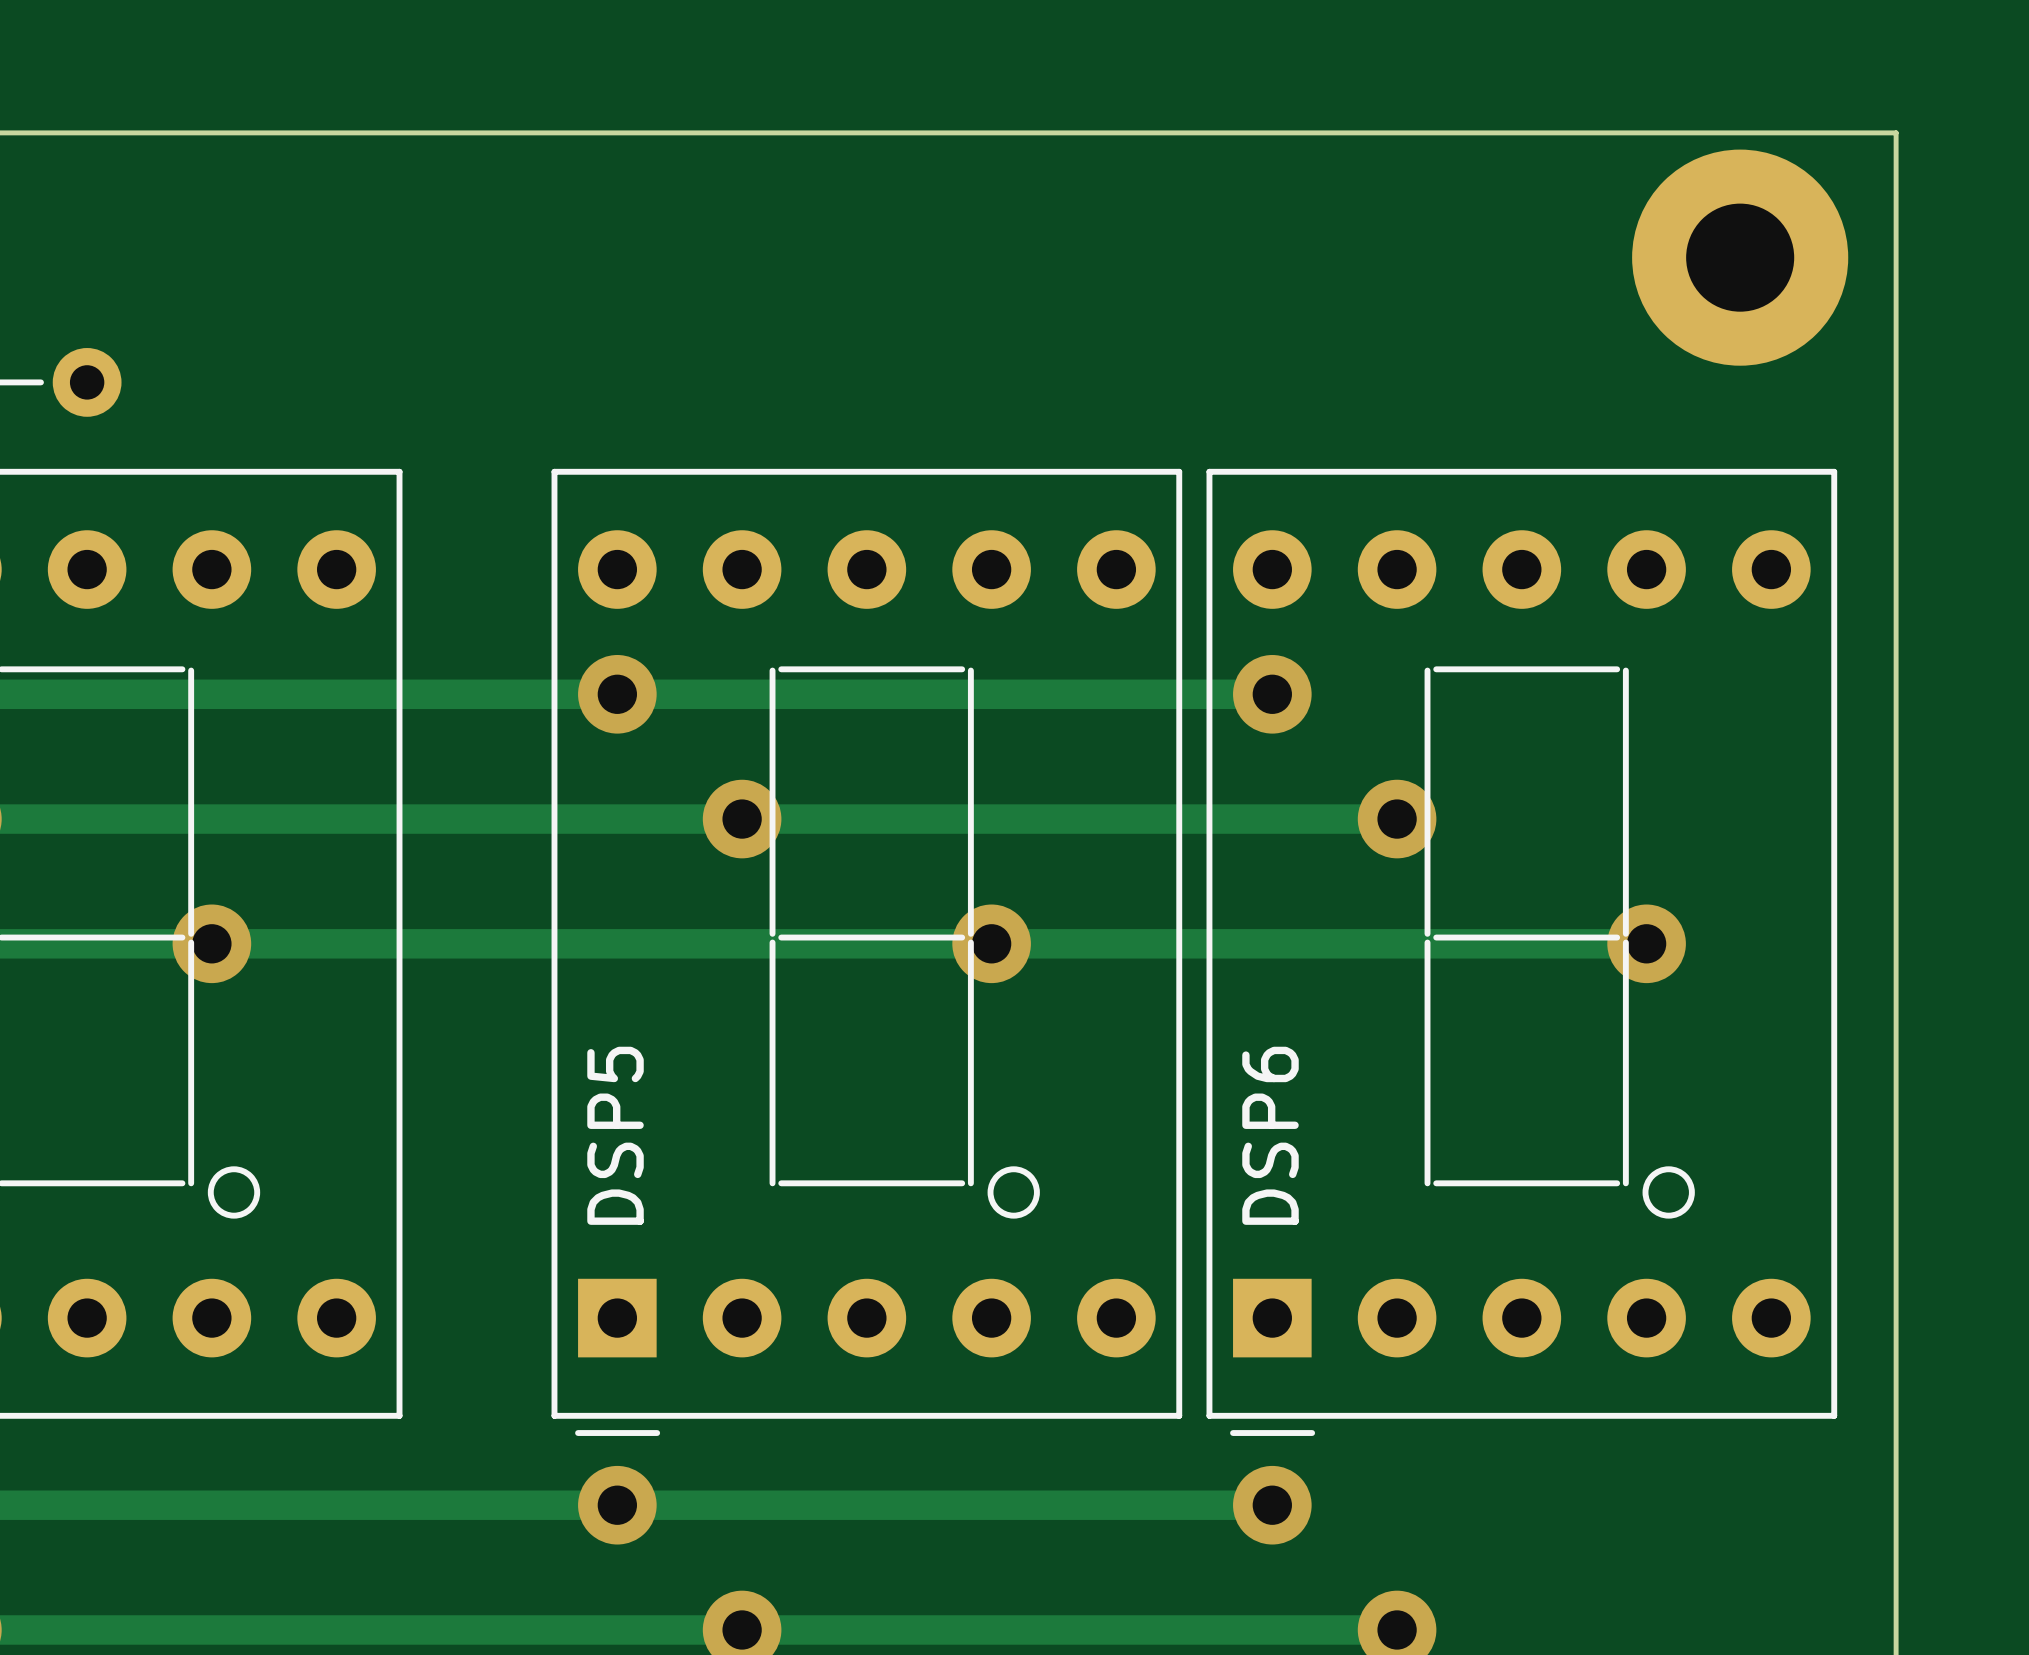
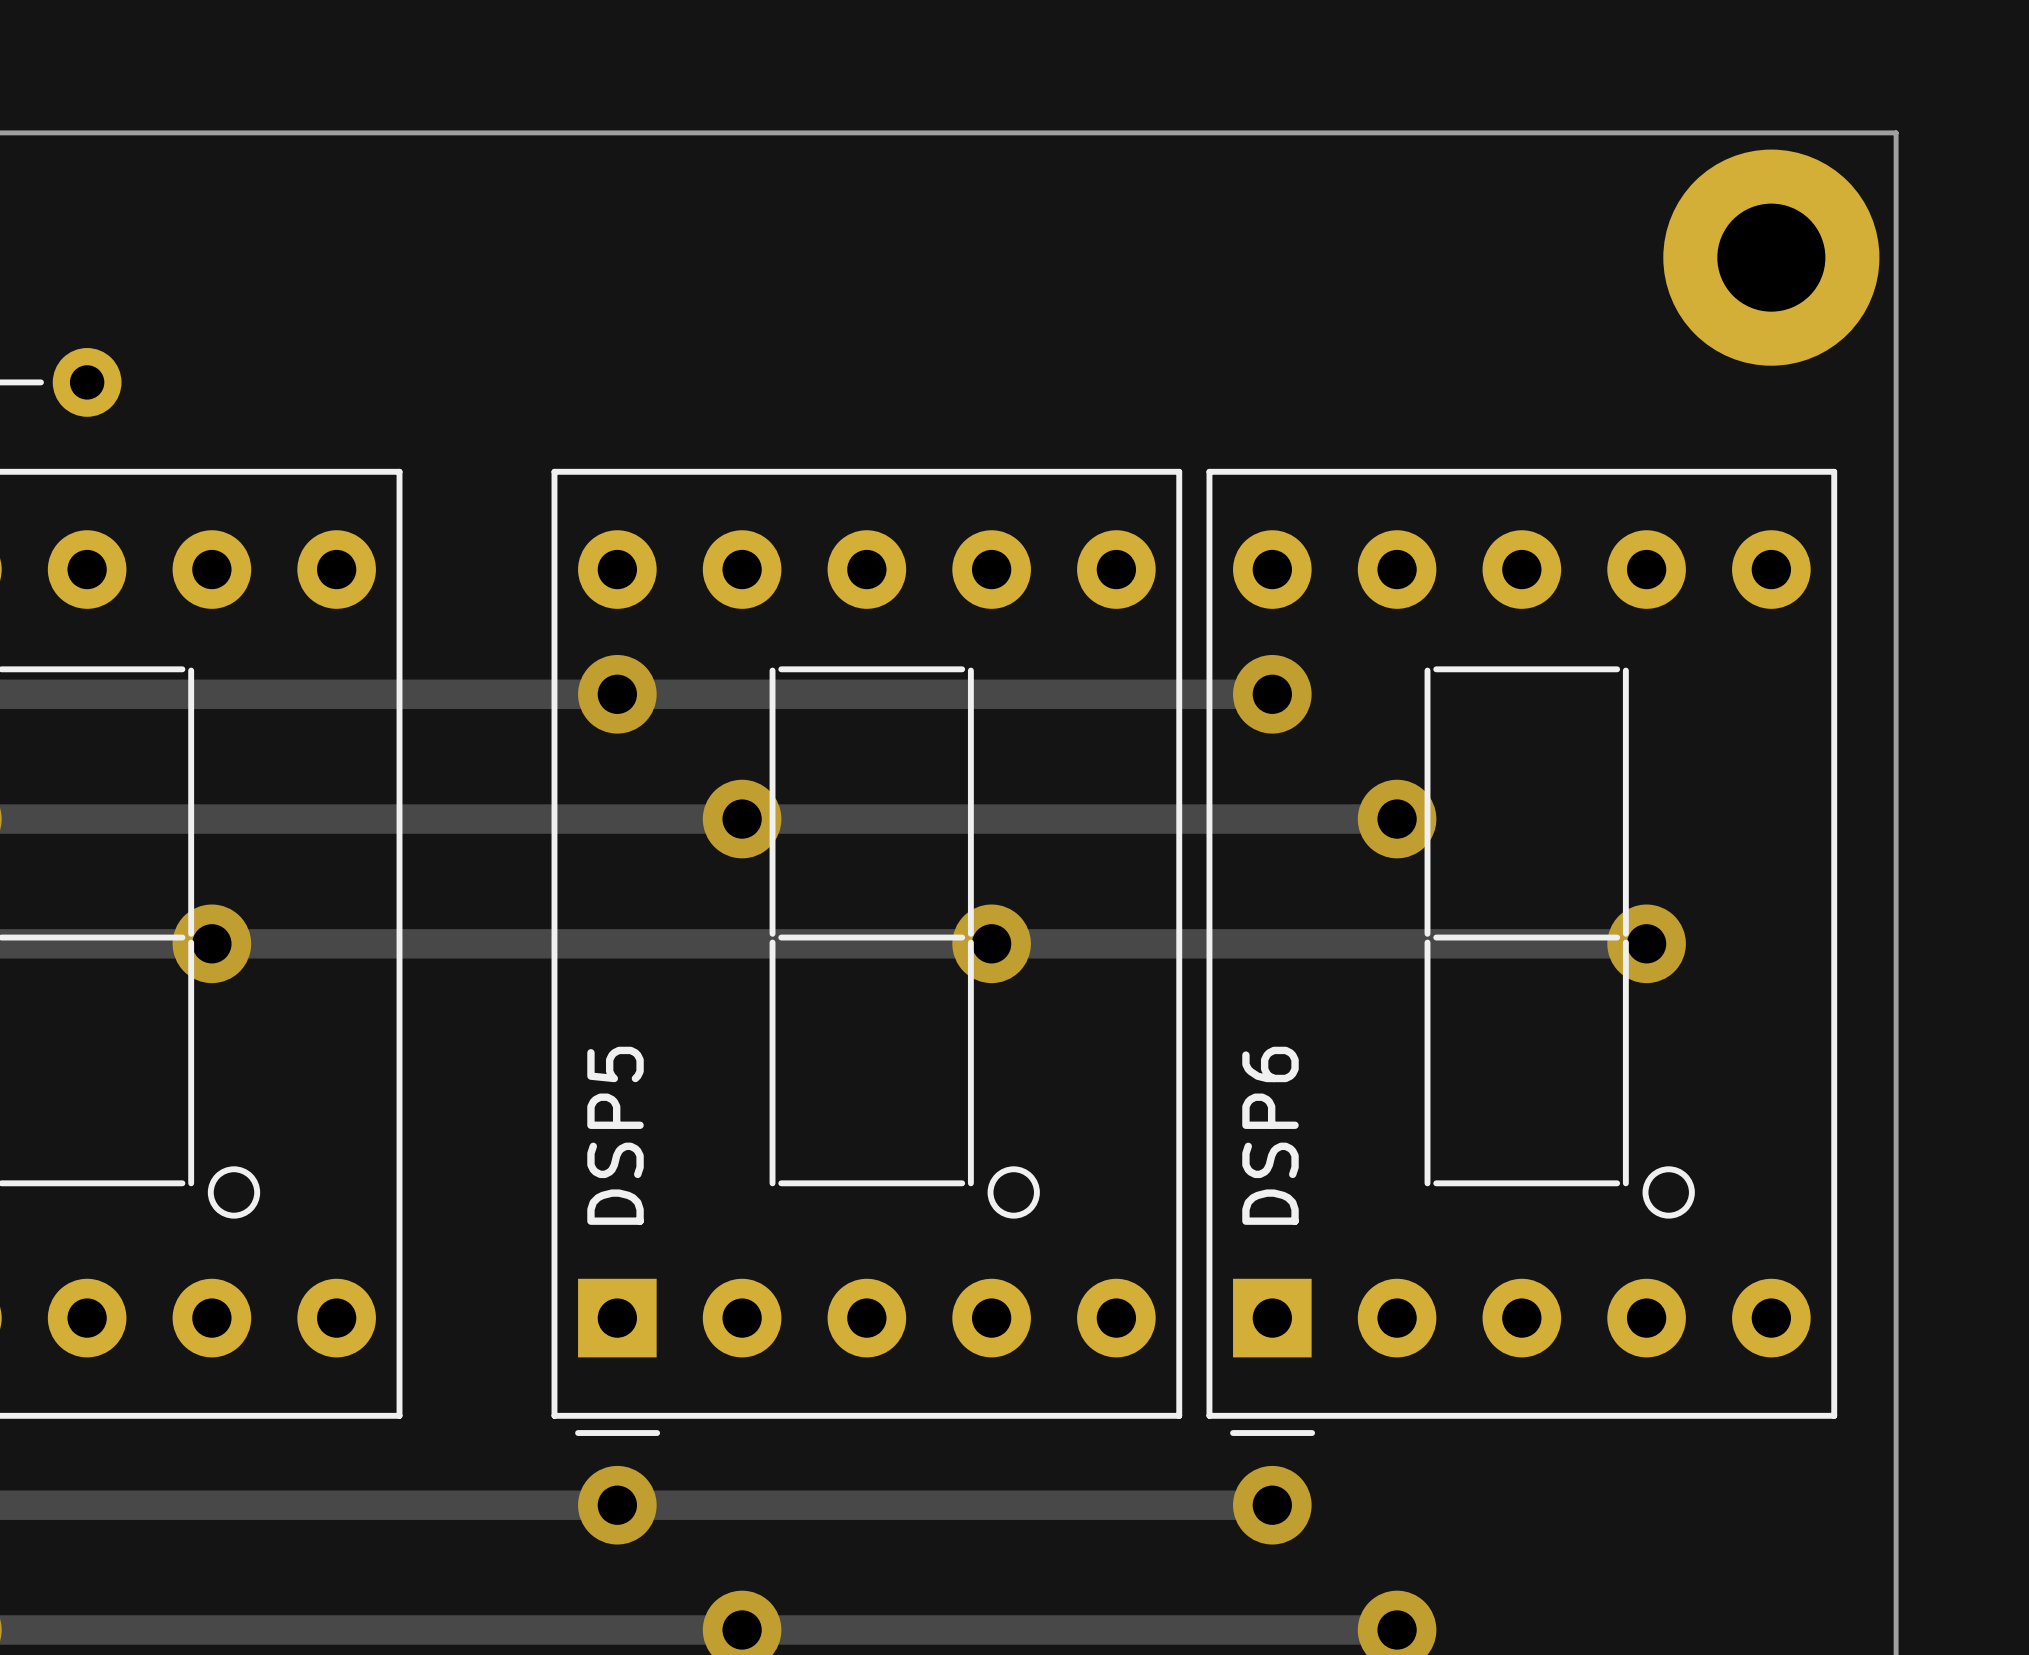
part position: (1740, 257) -> (1771, 257)

